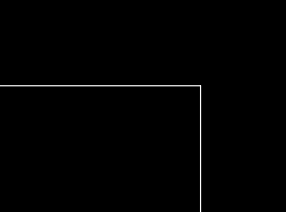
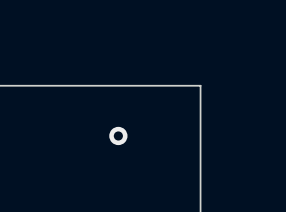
via: none -> (118, 135)

